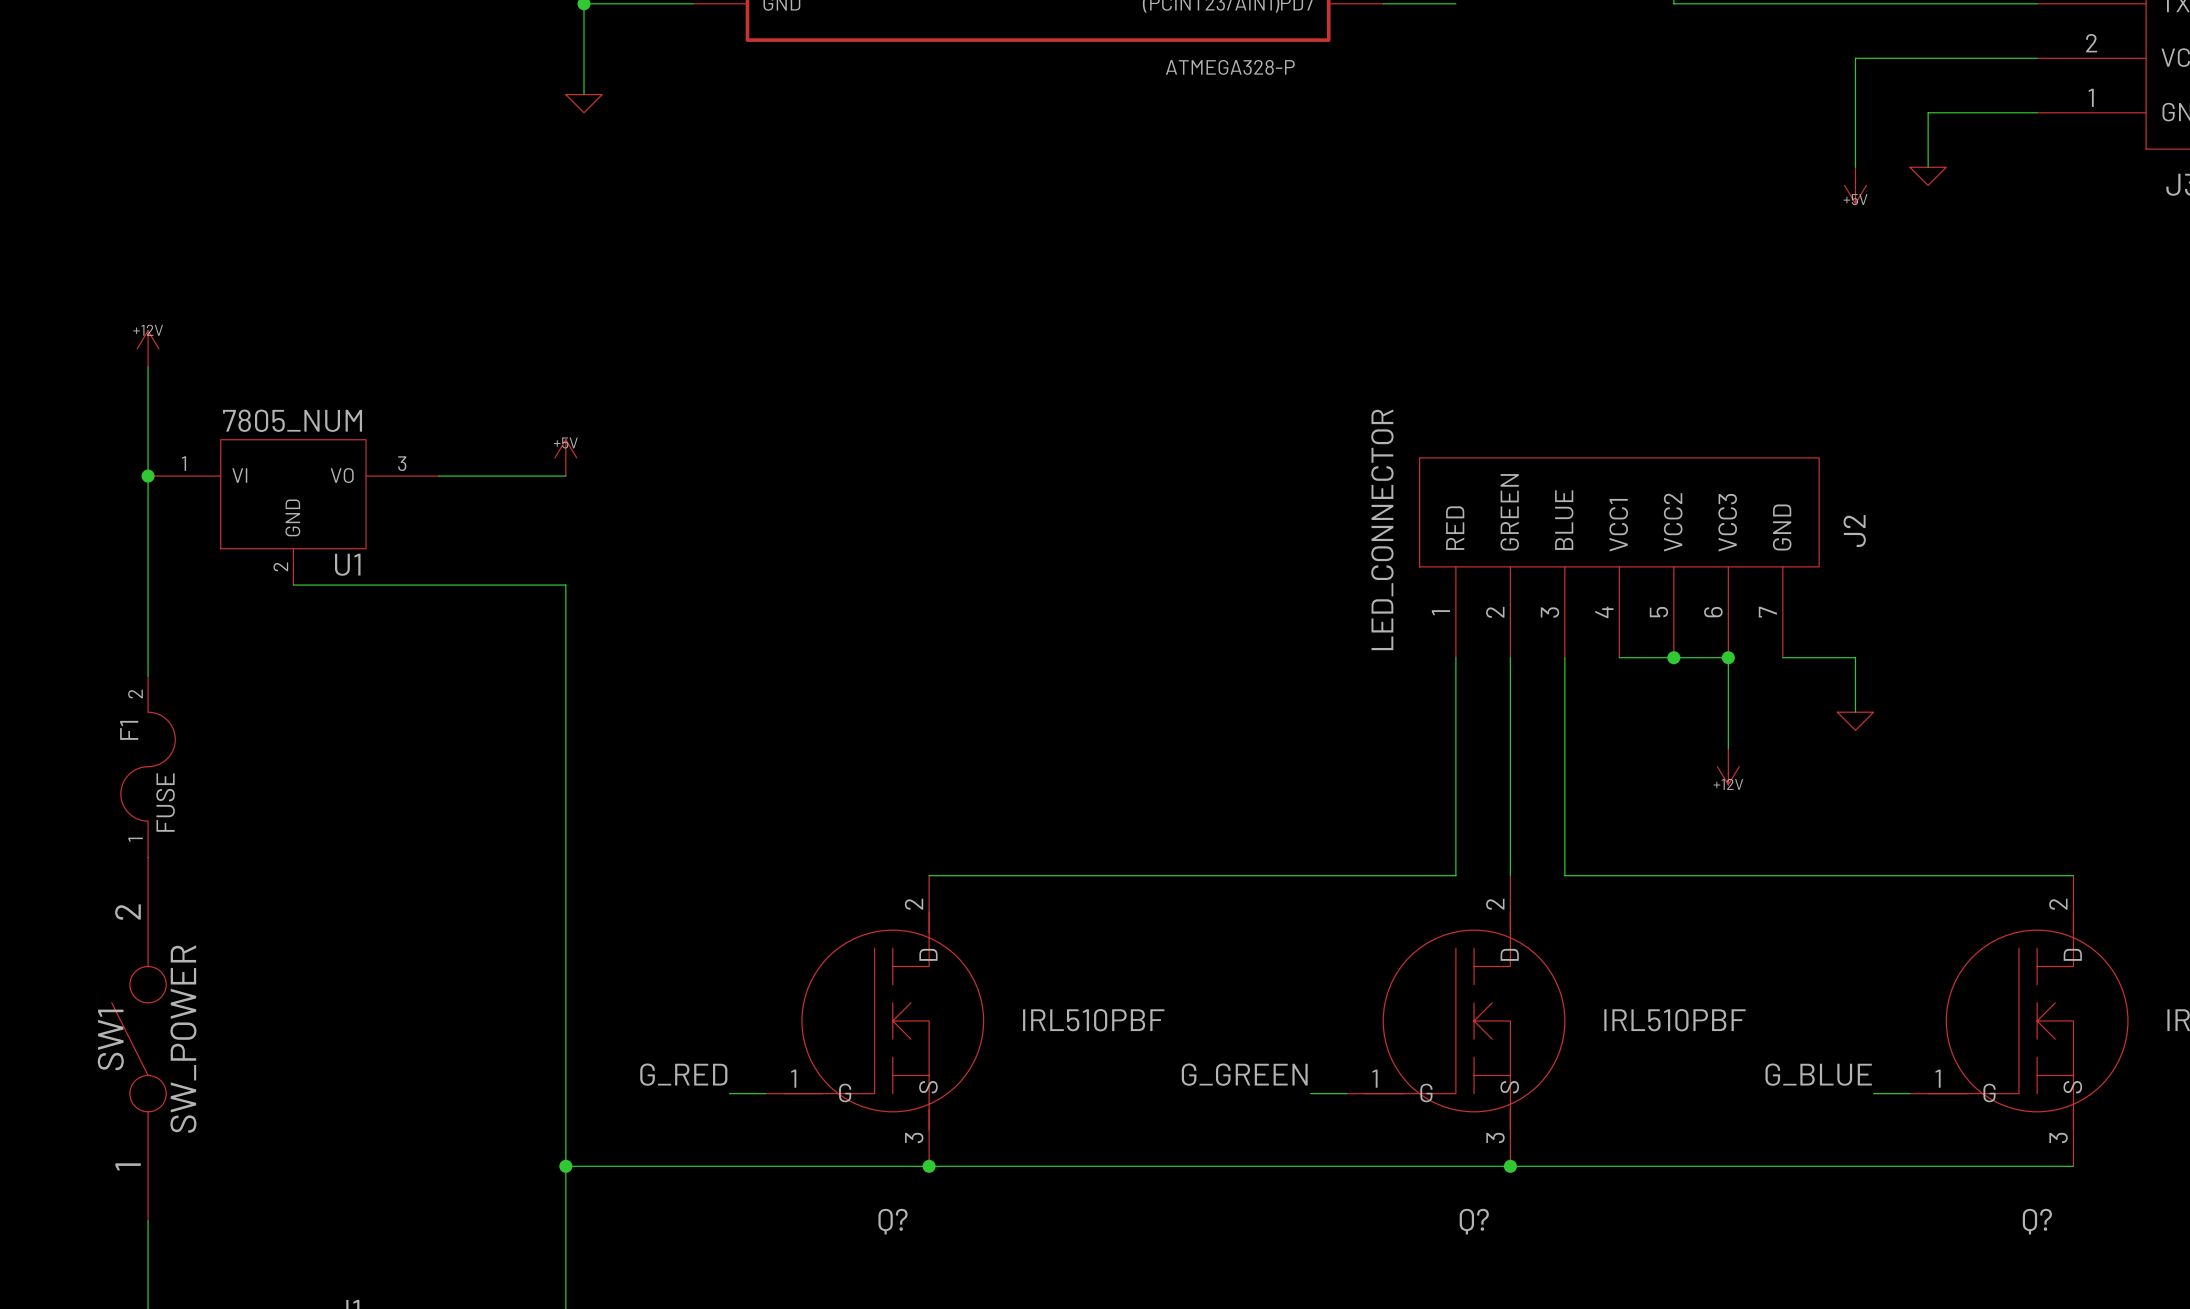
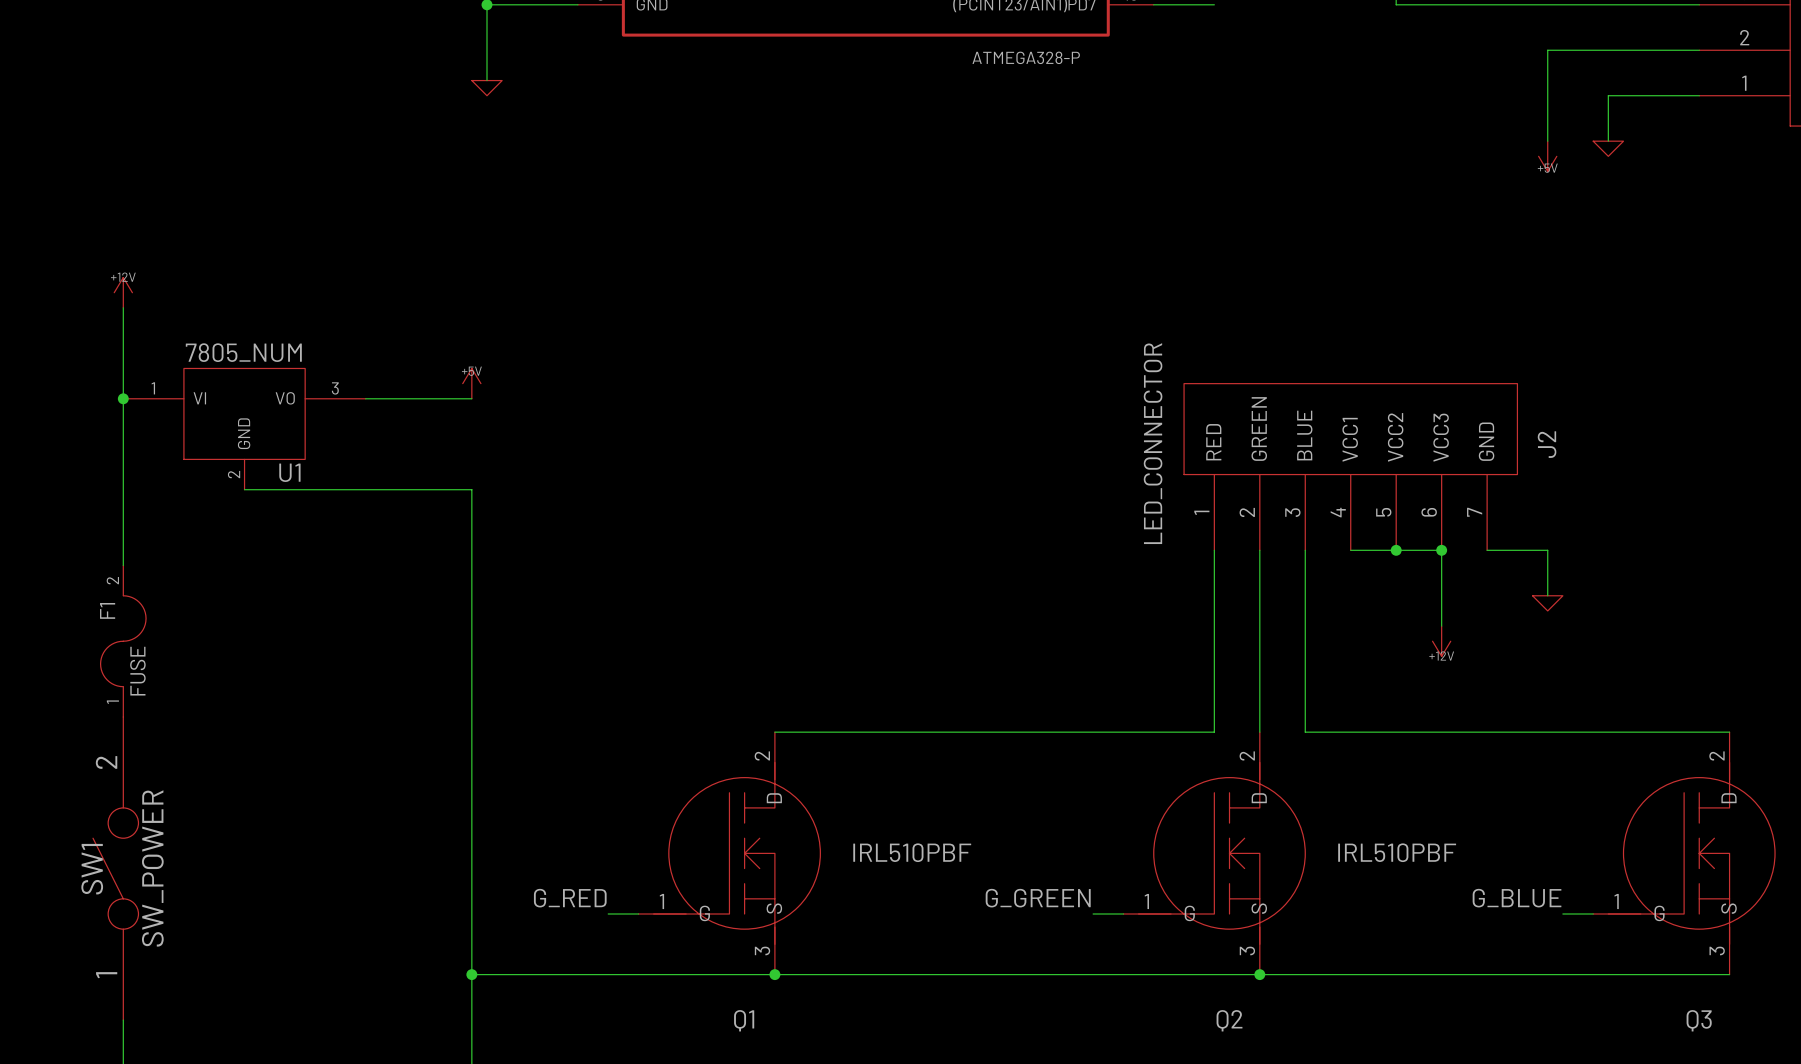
Q? name: Q? (893, 1221) -> Q1 (744, 1020)
Q? name: Q? (1474, 1221) -> Q2 (1229, 1020)
Q? name: Q? (2037, 1221) -> Q3 (1699, 1020)

